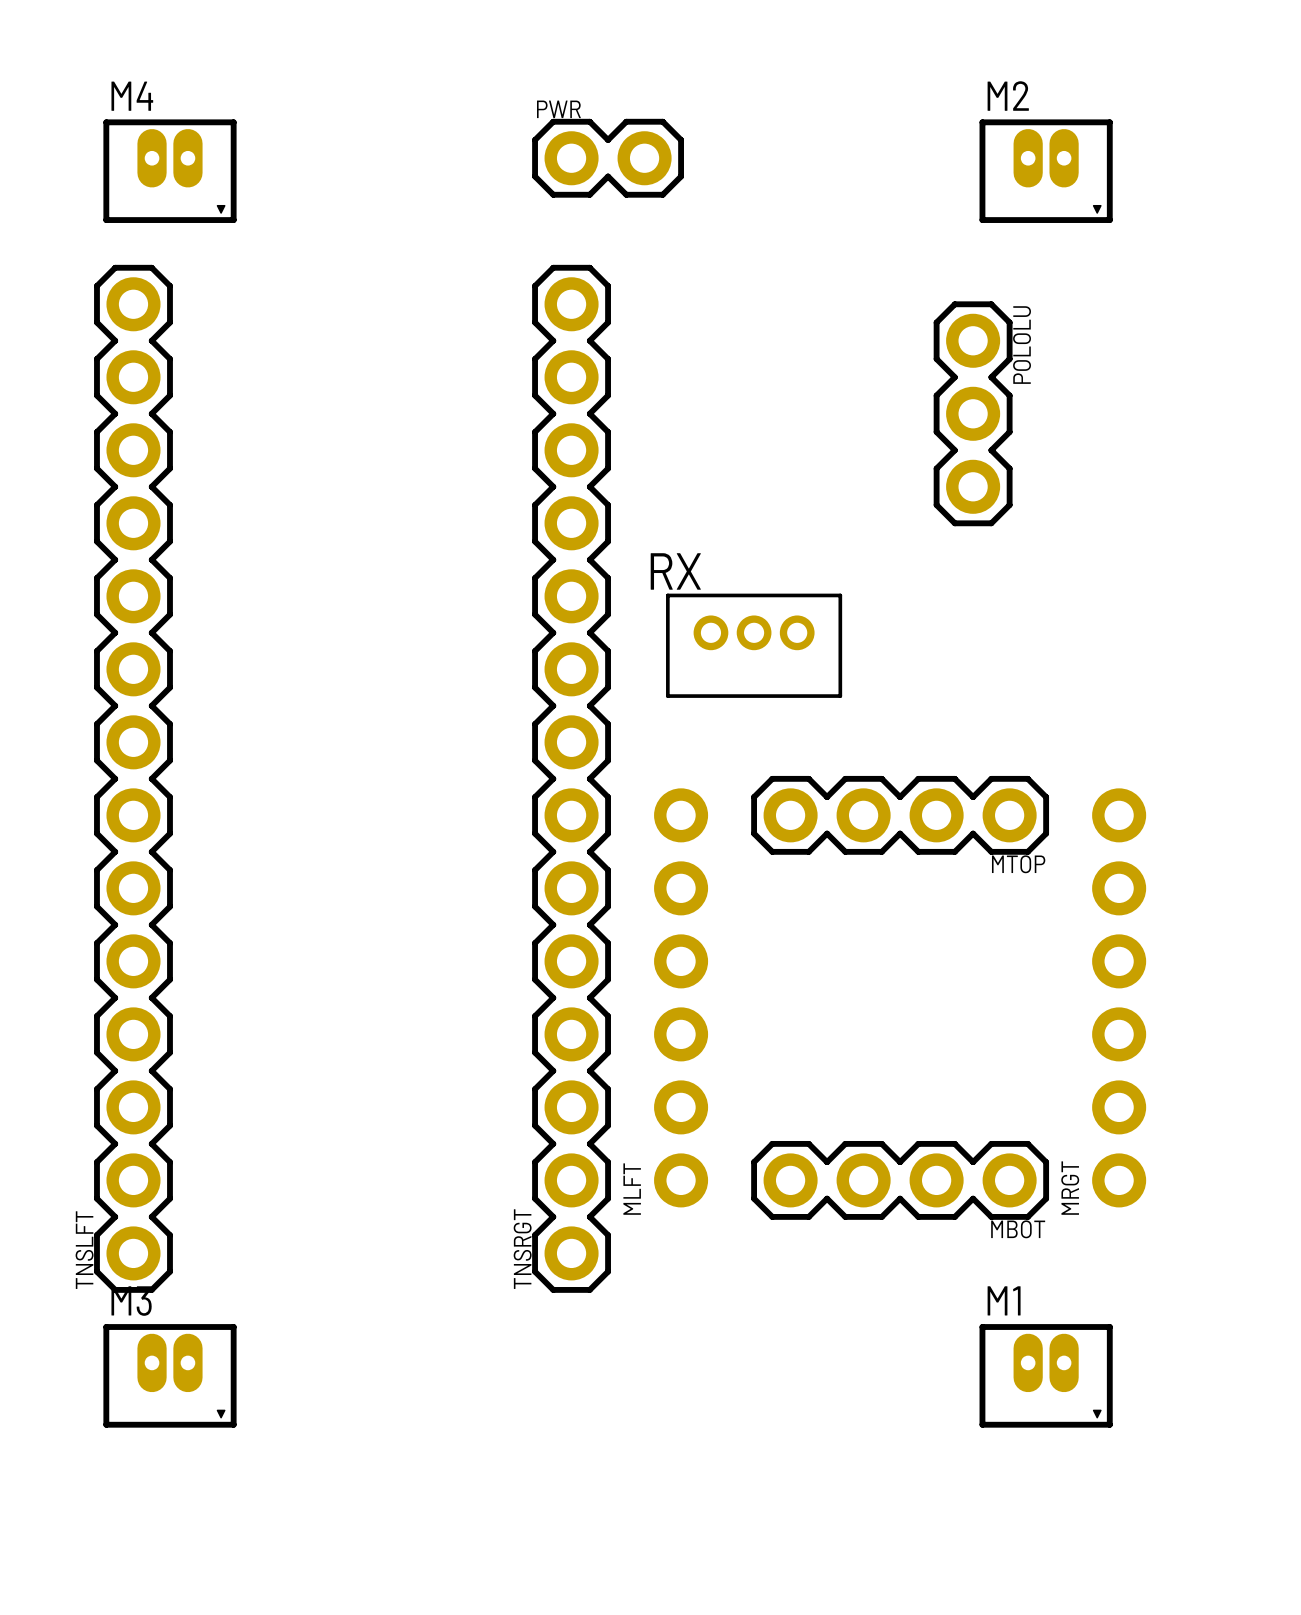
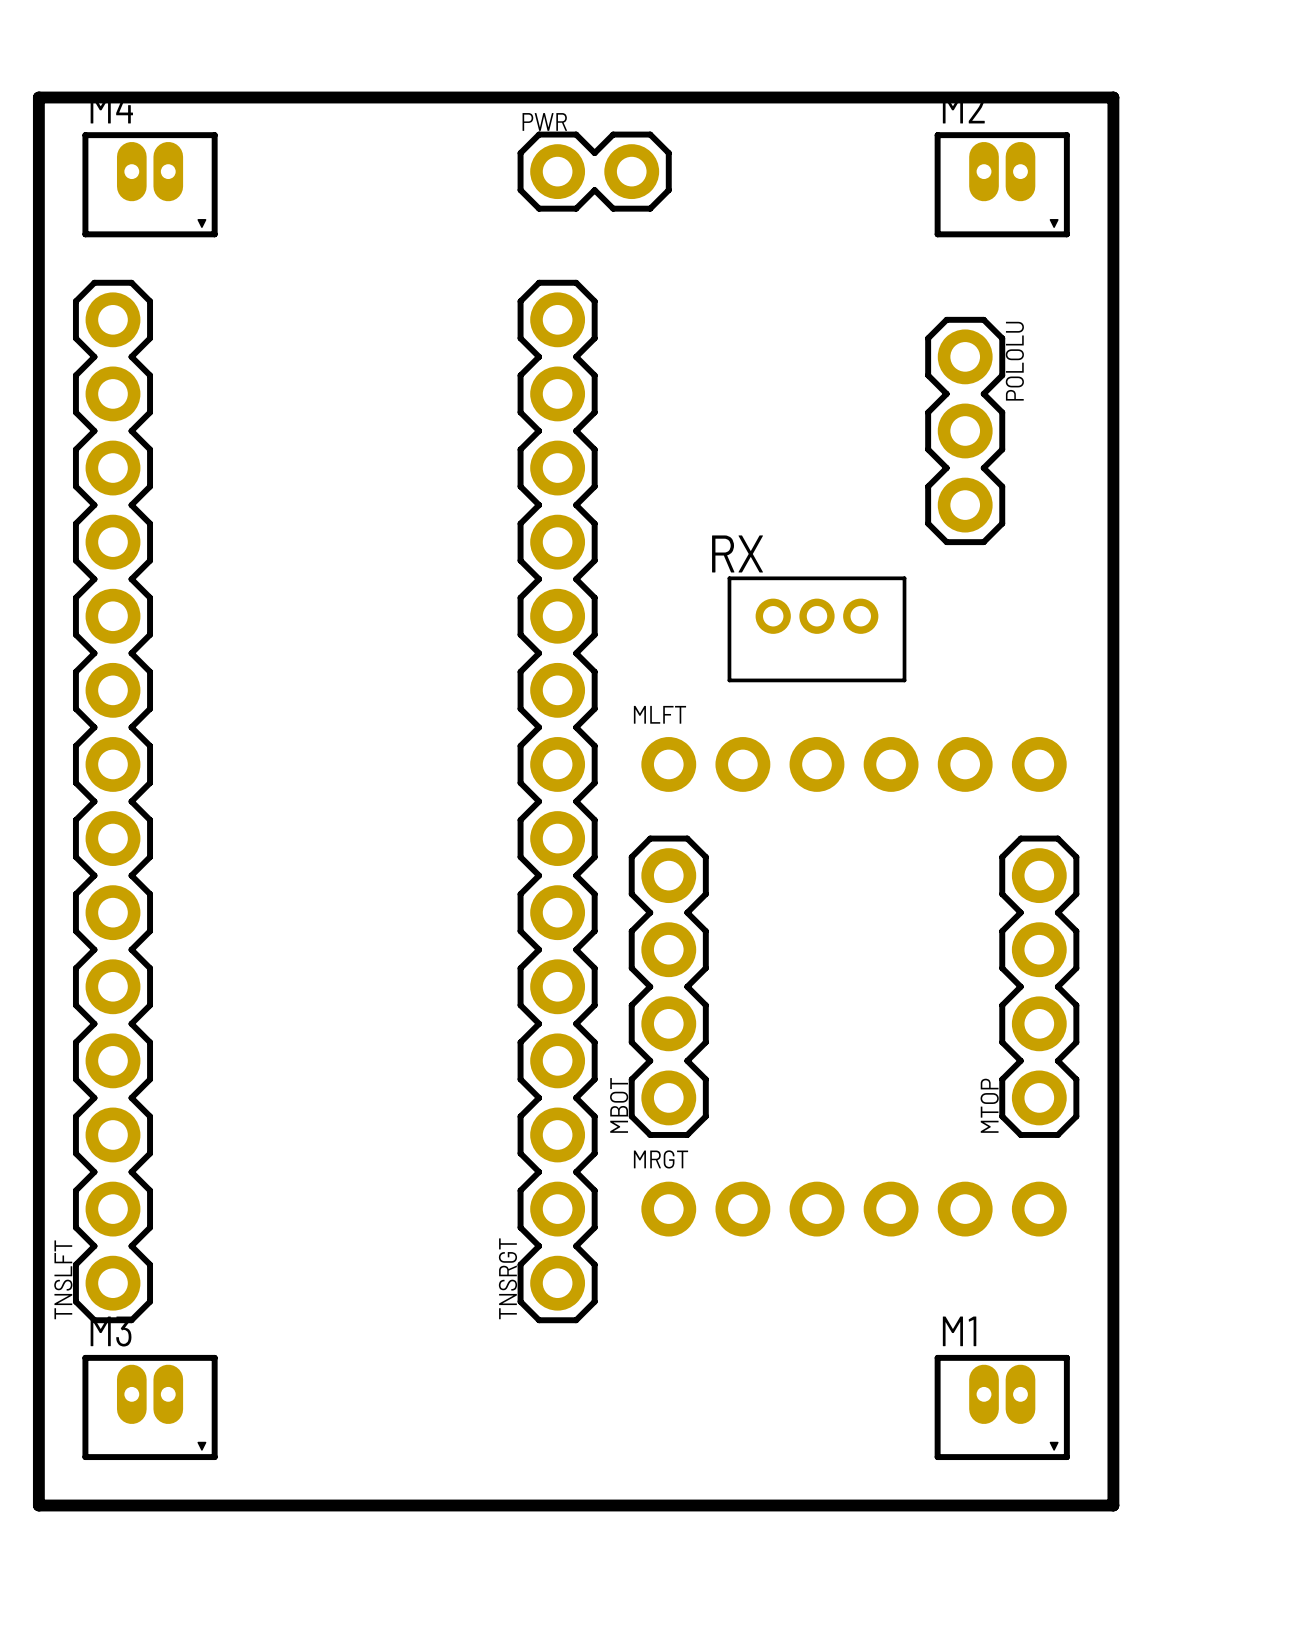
board edge: none -> (38, 97) (1113, 97) (1113, 1505) (38, 1505) (38, 97)
M2 position: (1046, 171) -> (1002, 184)
RX position: (754, 645) -> (816, 629)
MTOP rotation: 0° (900, 815) -> 90° clockwise (1039, 986)
MTOP position: (900, 815) -> (1039, 986)
MLFT rotation: 0° (681, 997) -> 90° clockwise (854, 764)
MLFT position: (681, 997) -> (854, 764)
MRGT rotation: 0° (1119, 997) -> 90° clockwise (854, 1209)
MRGT position: (1119, 997) -> (854, 1209)
MBOT rotation: 0° (900, 1180) -> 90° clockwise (668, 986)
MBOT position: (900, 1180) -> (668, 986)
M1 position: (1046, 1375) -> (1002, 1407)

